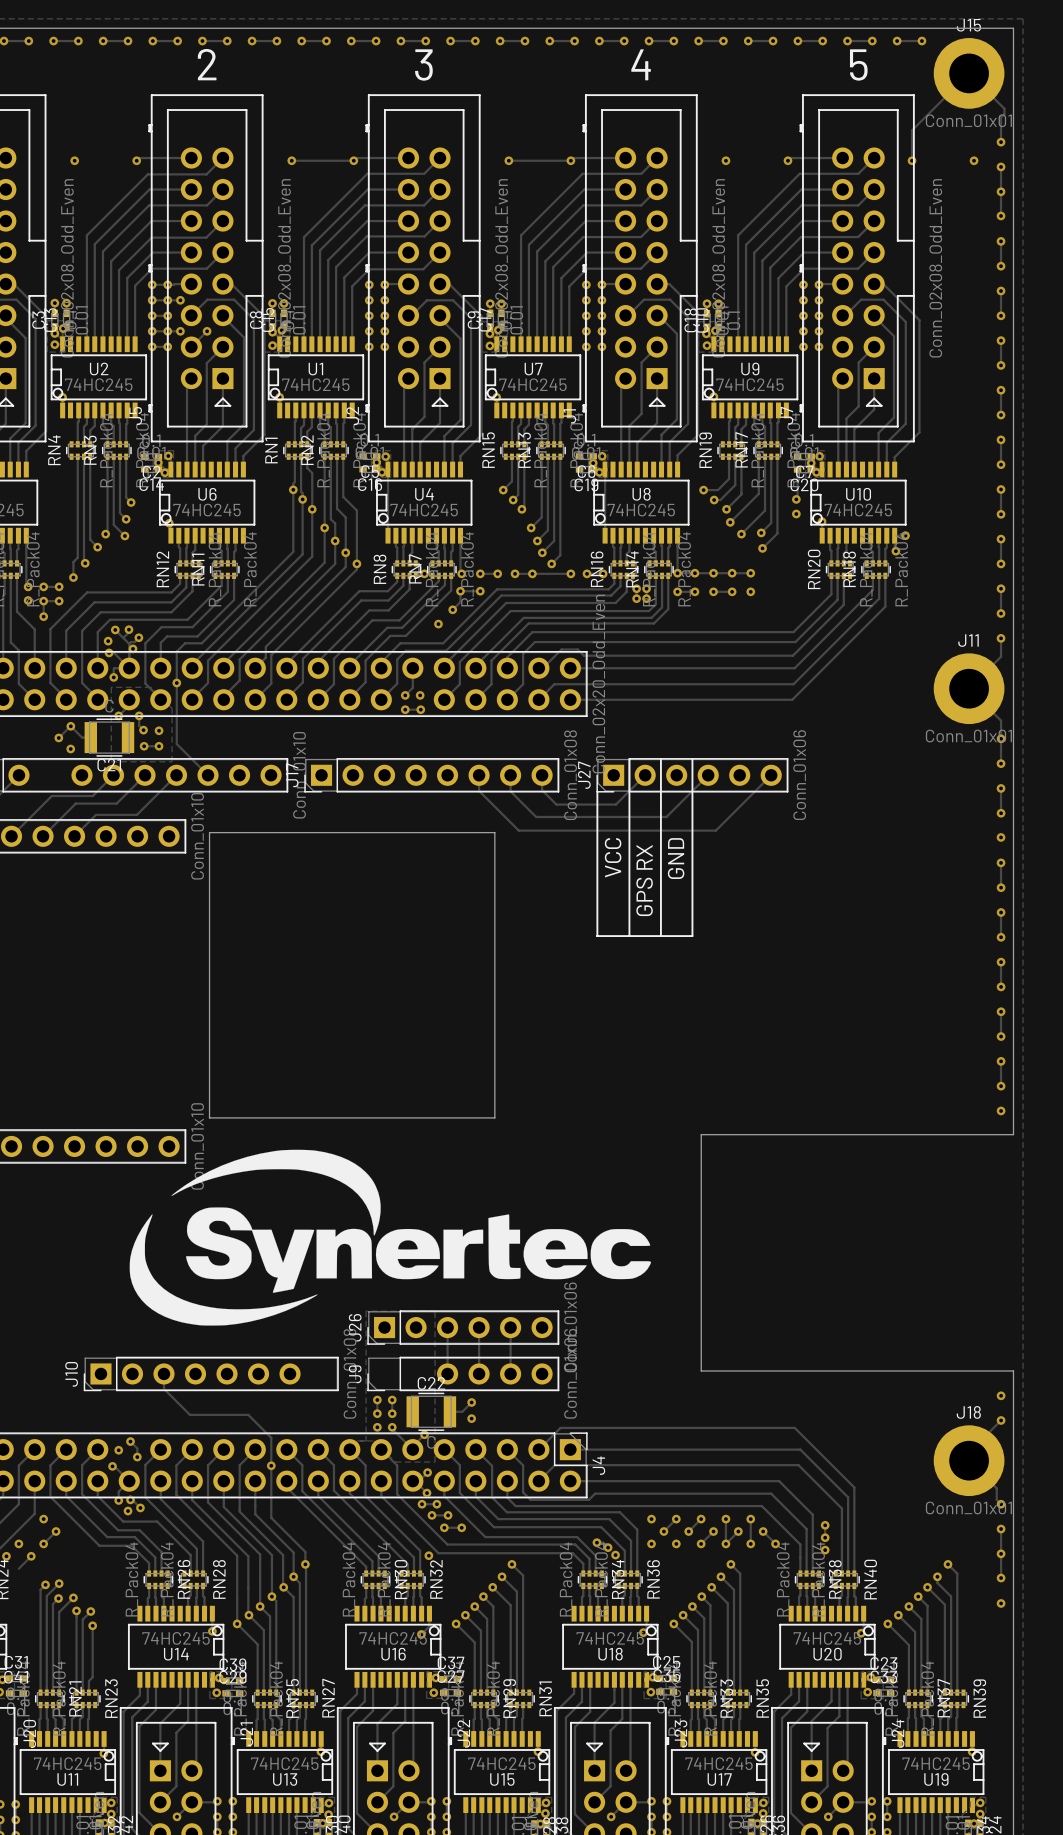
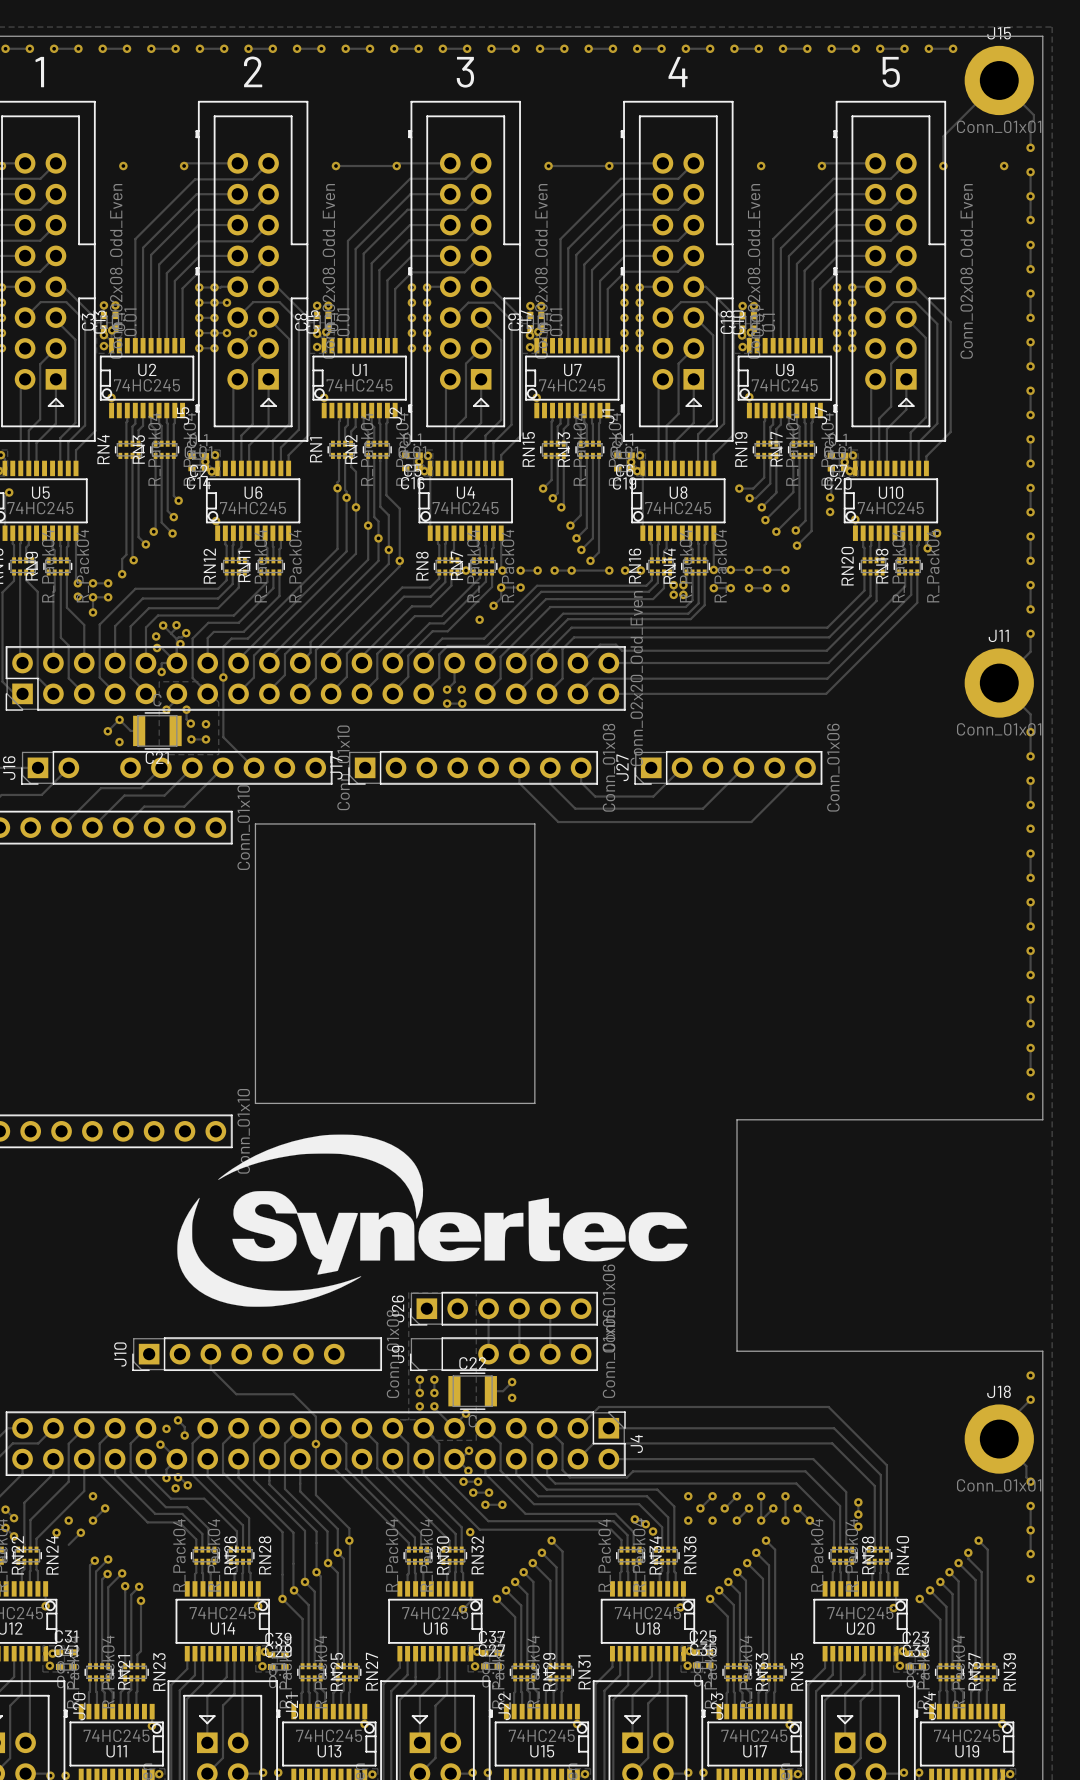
line: (629, 759) (629, 936) -> none
line: (660, 759) (660, 936) -> none
line: (692, 759) (692, 936) (596, 936) -> none
line: (597, 792) (597, 936) -> none
text: VCC (613, 857) -> none
text: GND (676, 858) -> none
text: GPS RX (644, 880) -> none

